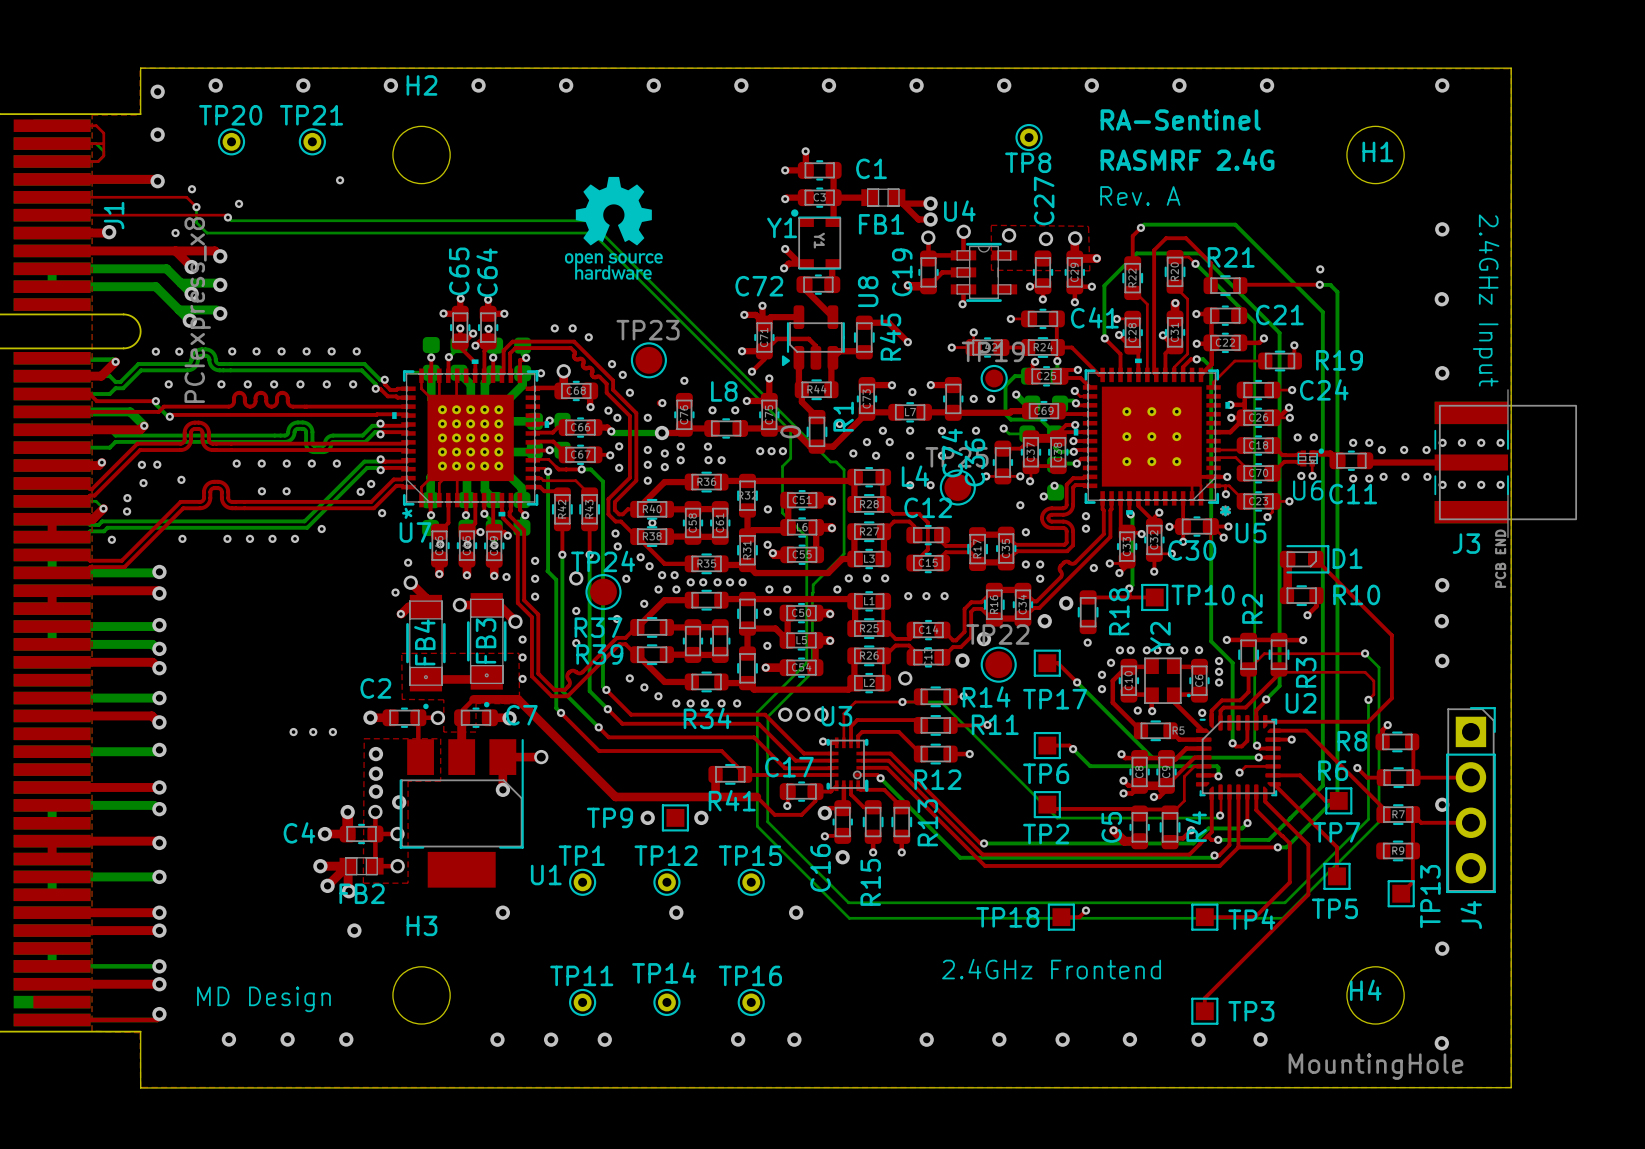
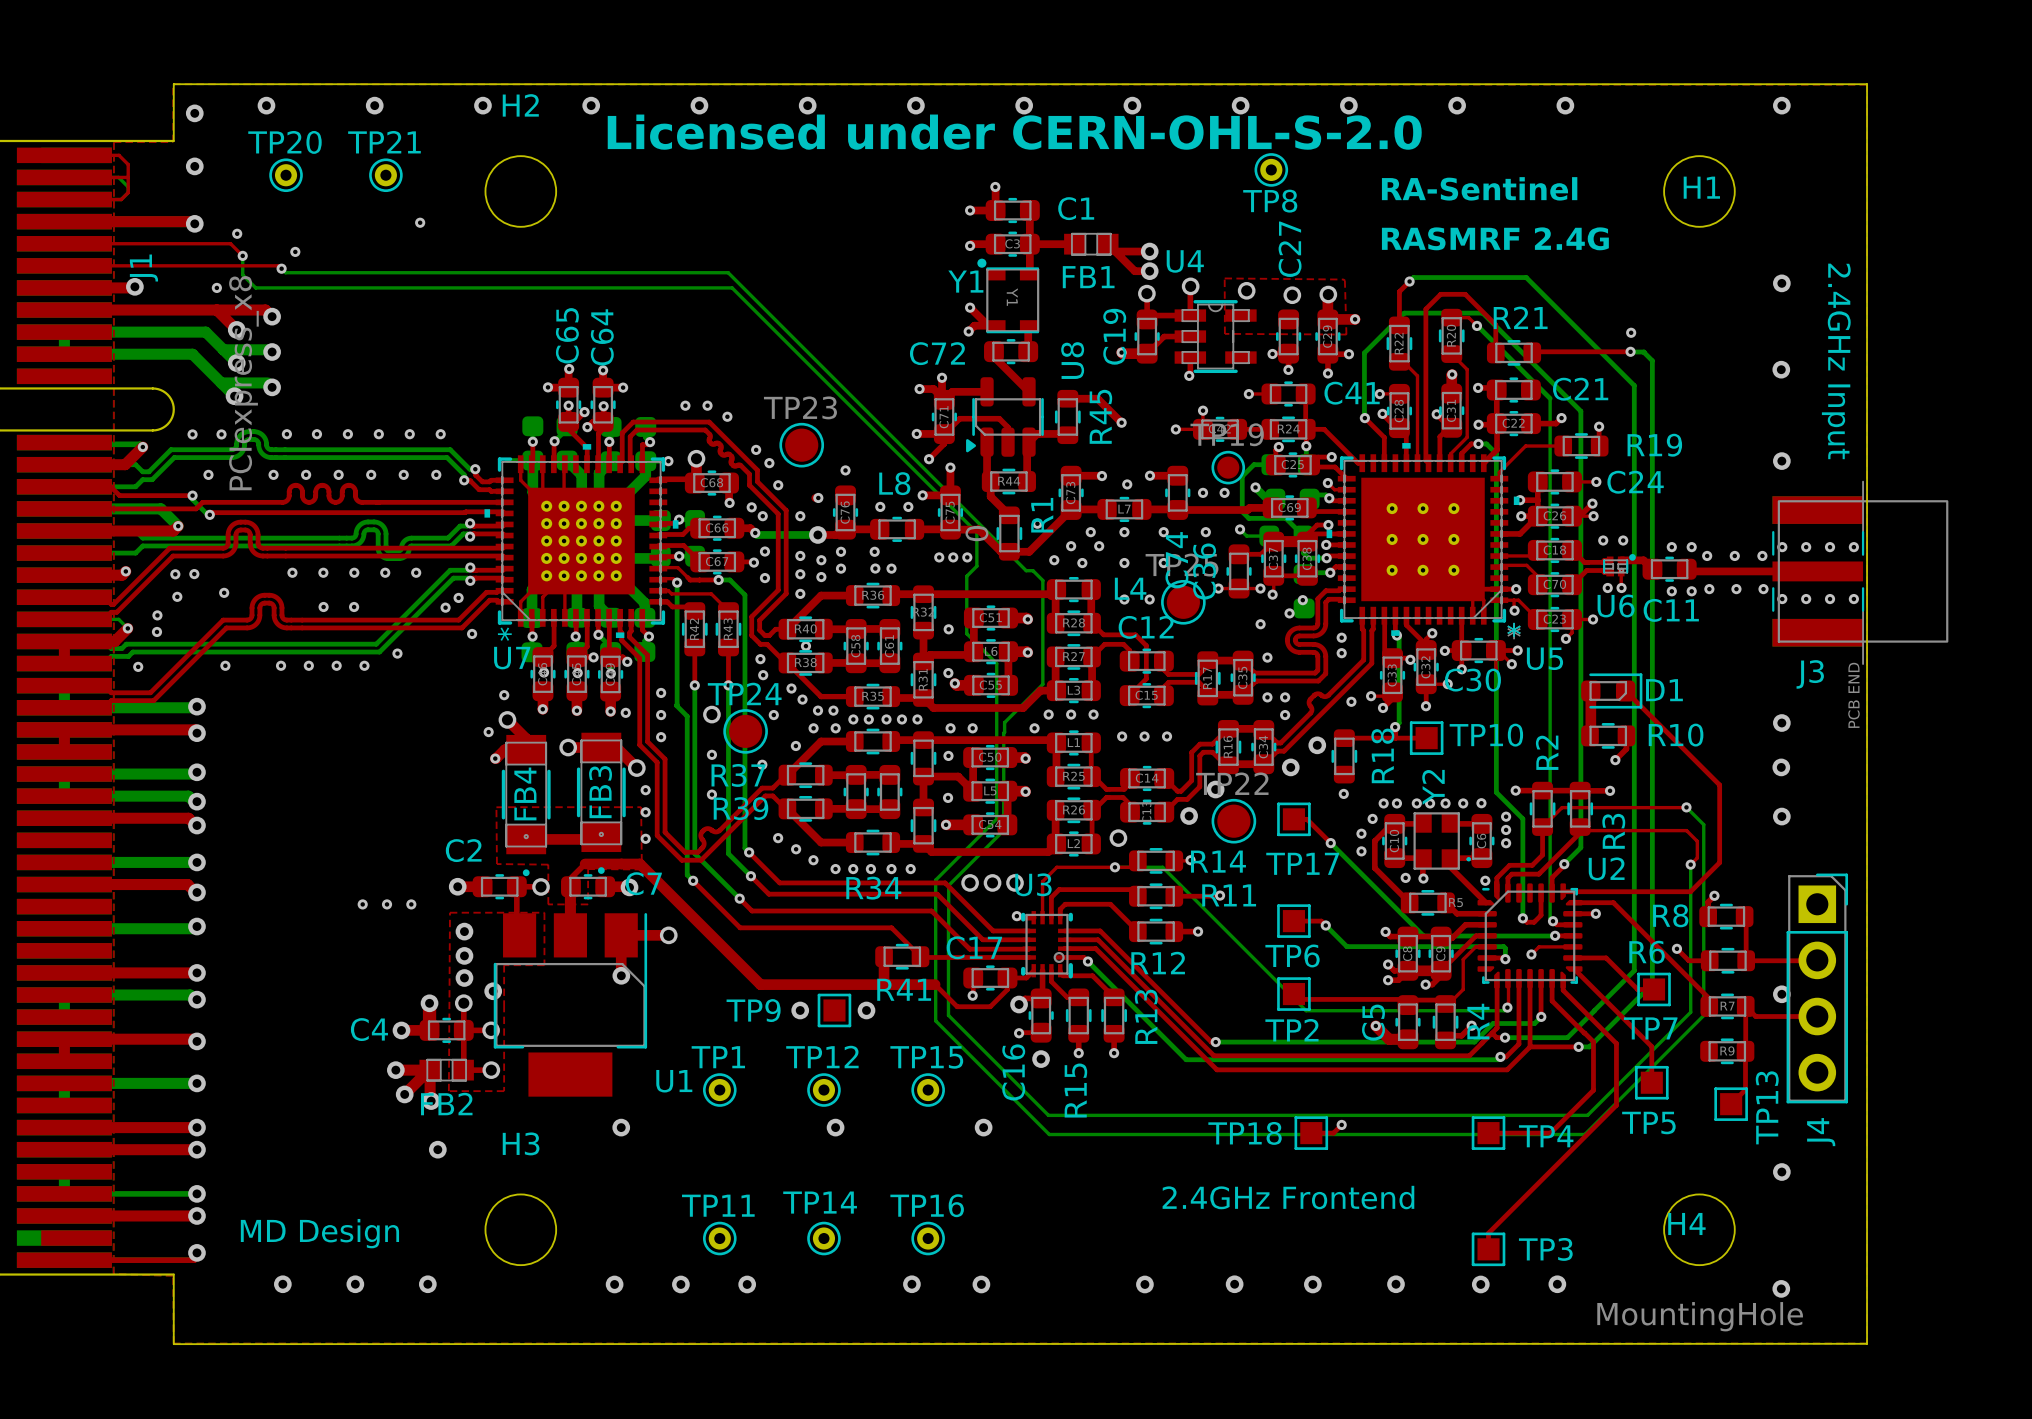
text: none -> Licensed under CERN-OHL-S-2.0 (1014, 132)
text position: RA-Sentinel (1180, 119) -> RA-Sentinel (1479, 188)
text position: RASMRF 2.4G (1187, 159) -> RASMRF 2.4G (1495, 238)
drawing: [564, 176, 663, 280] -> none
text: Rev. A (1140, 195) -> none

